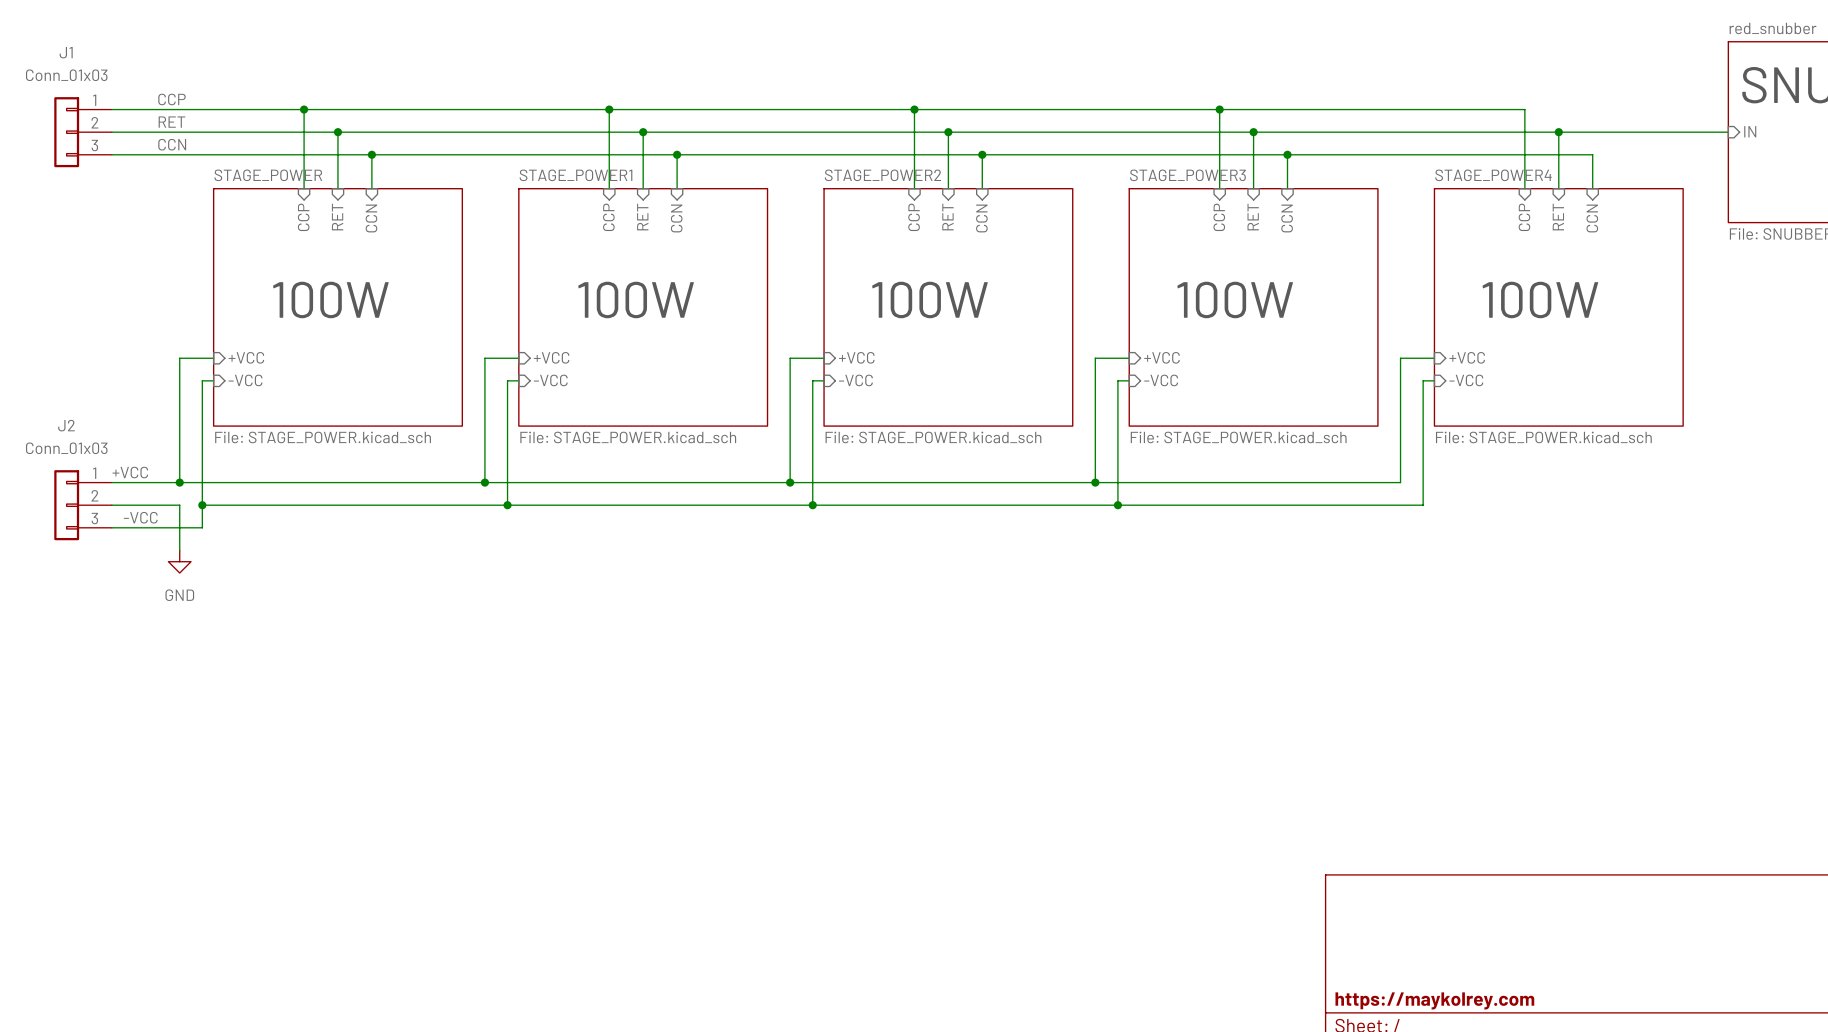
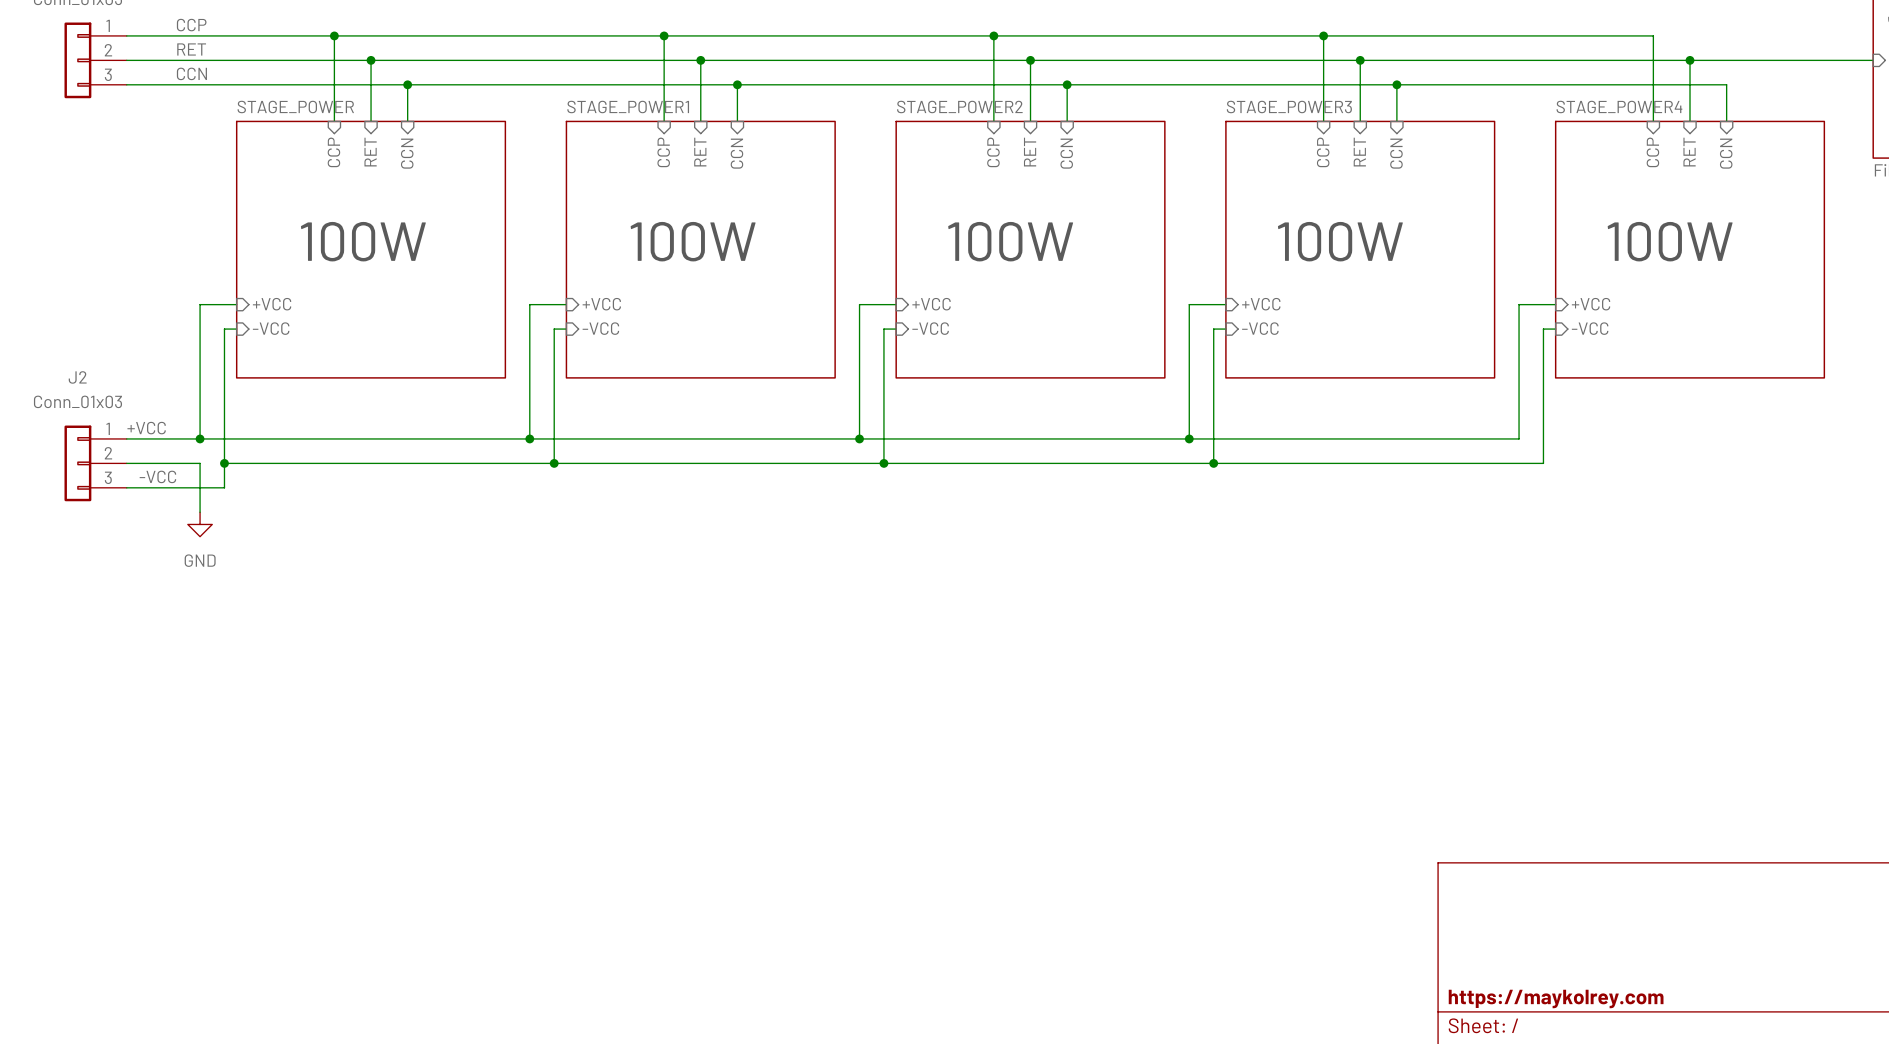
sheet STAGE_POWER value: File: STAGE_POWER.kicad_sch (323, 437) -> none
sheet STAGE_POWER1 value: File: STAGE_POWER.kicad_sch (628, 437) -> none
sheet STAGE_POWER2 value: File: STAGE_POWER.kicad_sch (933, 437) -> none
sheet STAGE_POWER3 value: File: STAGE_POWER.kicad_sch (1238, 437) -> none
sheet STAGE_POWER4 value: File: STAGE_POWER.kicad_sch (1543, 437) -> none

